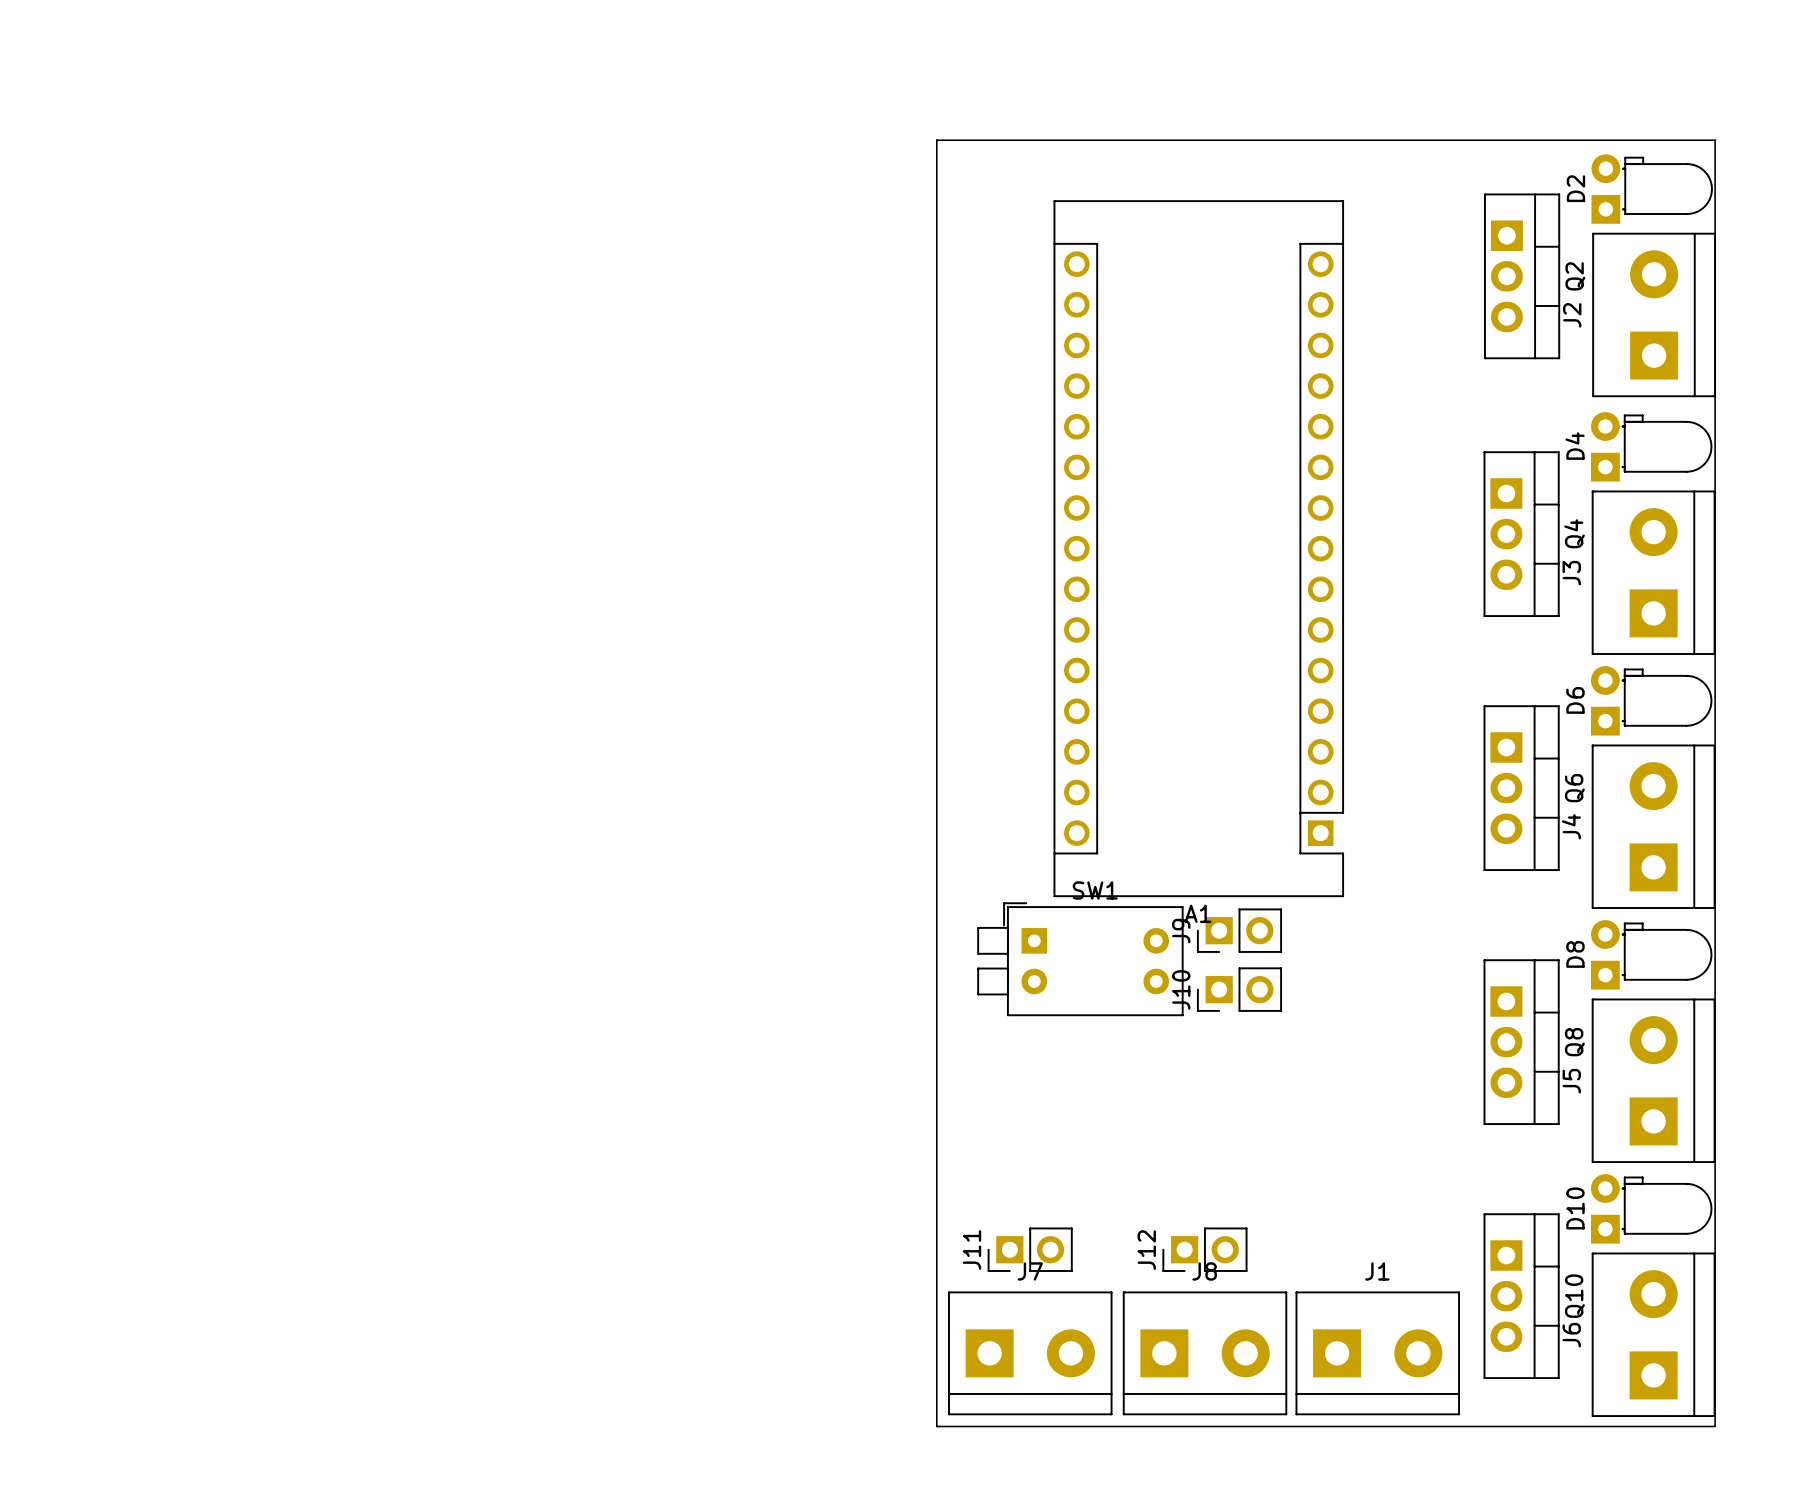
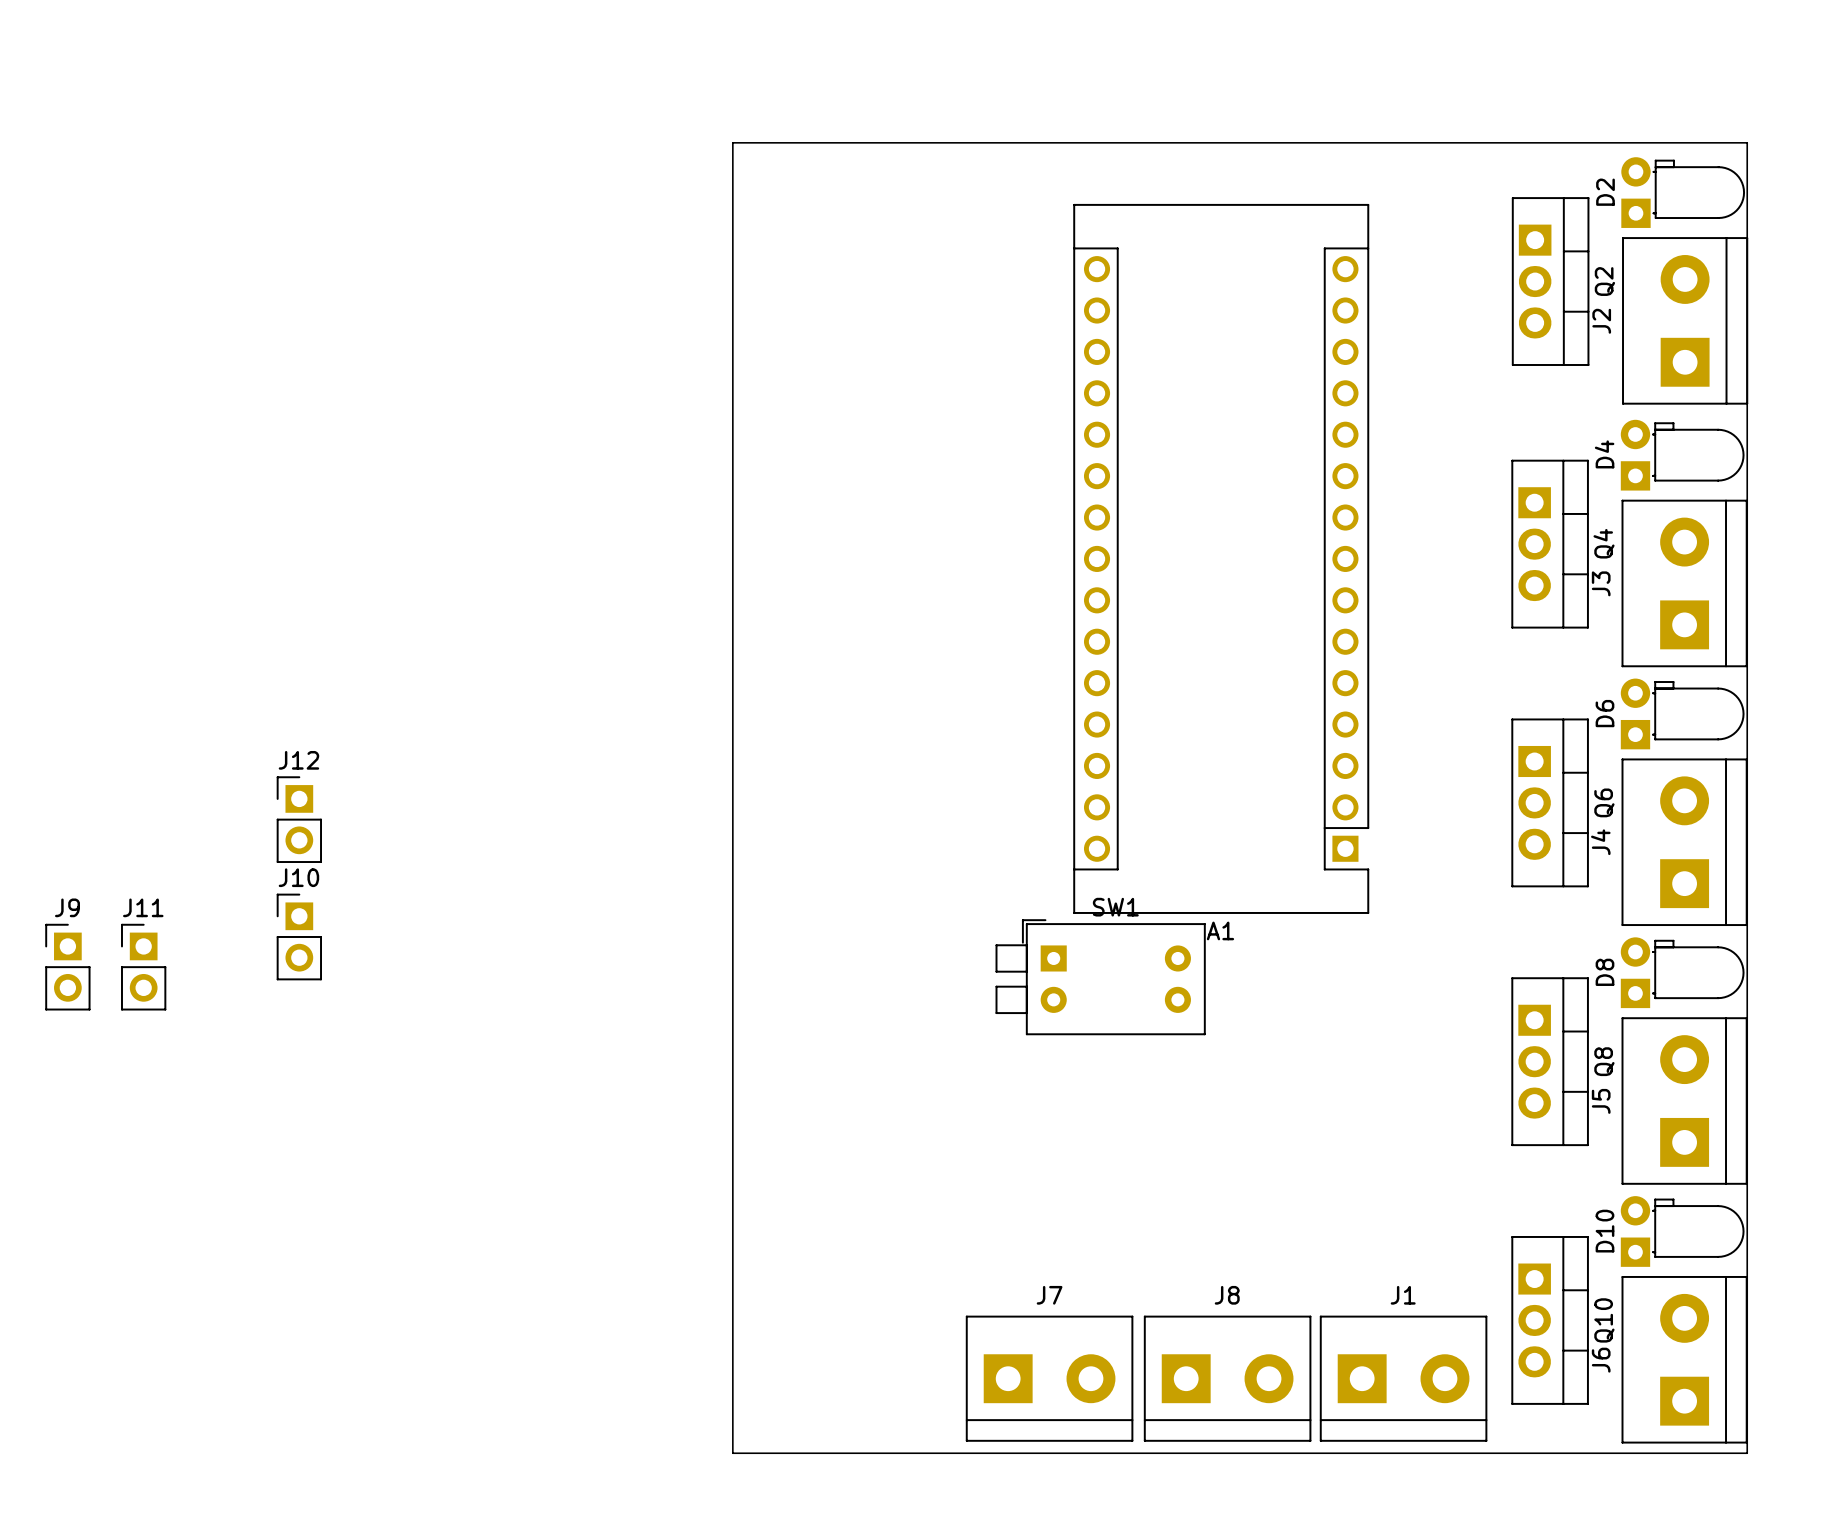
board edge: (936, 140) (936, 1426) -> (954, 142) (732, 142) (732, 1453) (954, 1453)
J9 rotation: 0° (1239, 930) -> 90° clockwise (67, 967)
J9 position: (1239, 930) -> (67, 967)
J10 rotation: 0° (1239, 989) -> 90° clockwise (299, 936)
J10 position: (1239, 989) -> (299, 936)
J11 rotation: 0° (1030, 1249) -> 90° clockwise (143, 967)
J11 position: (1030, 1249) -> (143, 967)
J12 rotation: 0° (1204, 1249) -> 90° clockwise (299, 819)
J12 position: (1204, 1249) -> (299, 819)

